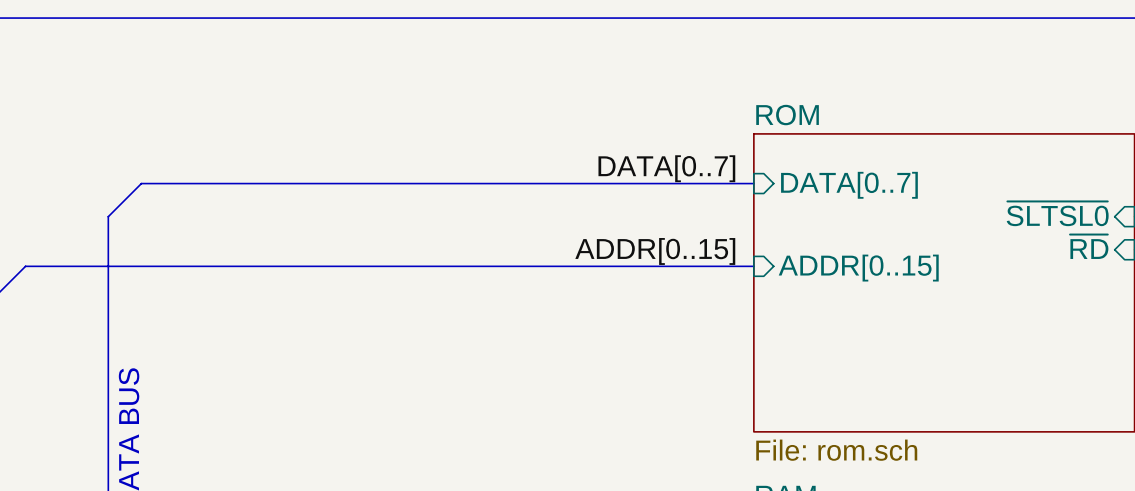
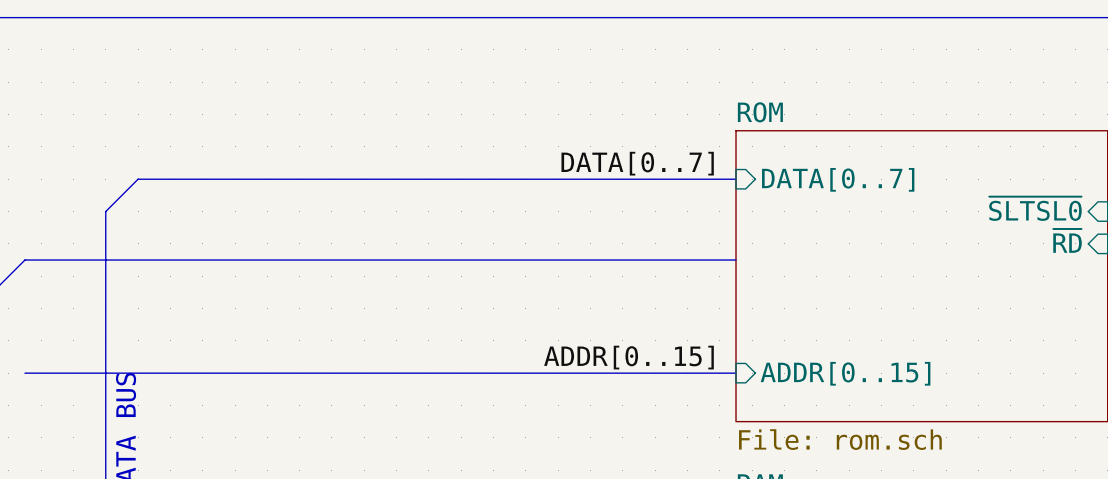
label: ADDR[0..15] (655, 251) -> none
sheet pin: ADDR[0..15] (858, 268) -> none
label: none -> ADDR[0..15] (629, 357)
bus: none -> (24, 373) (736, 373)
sheet pin: none -> ADDR[0..15] (845, 373)

